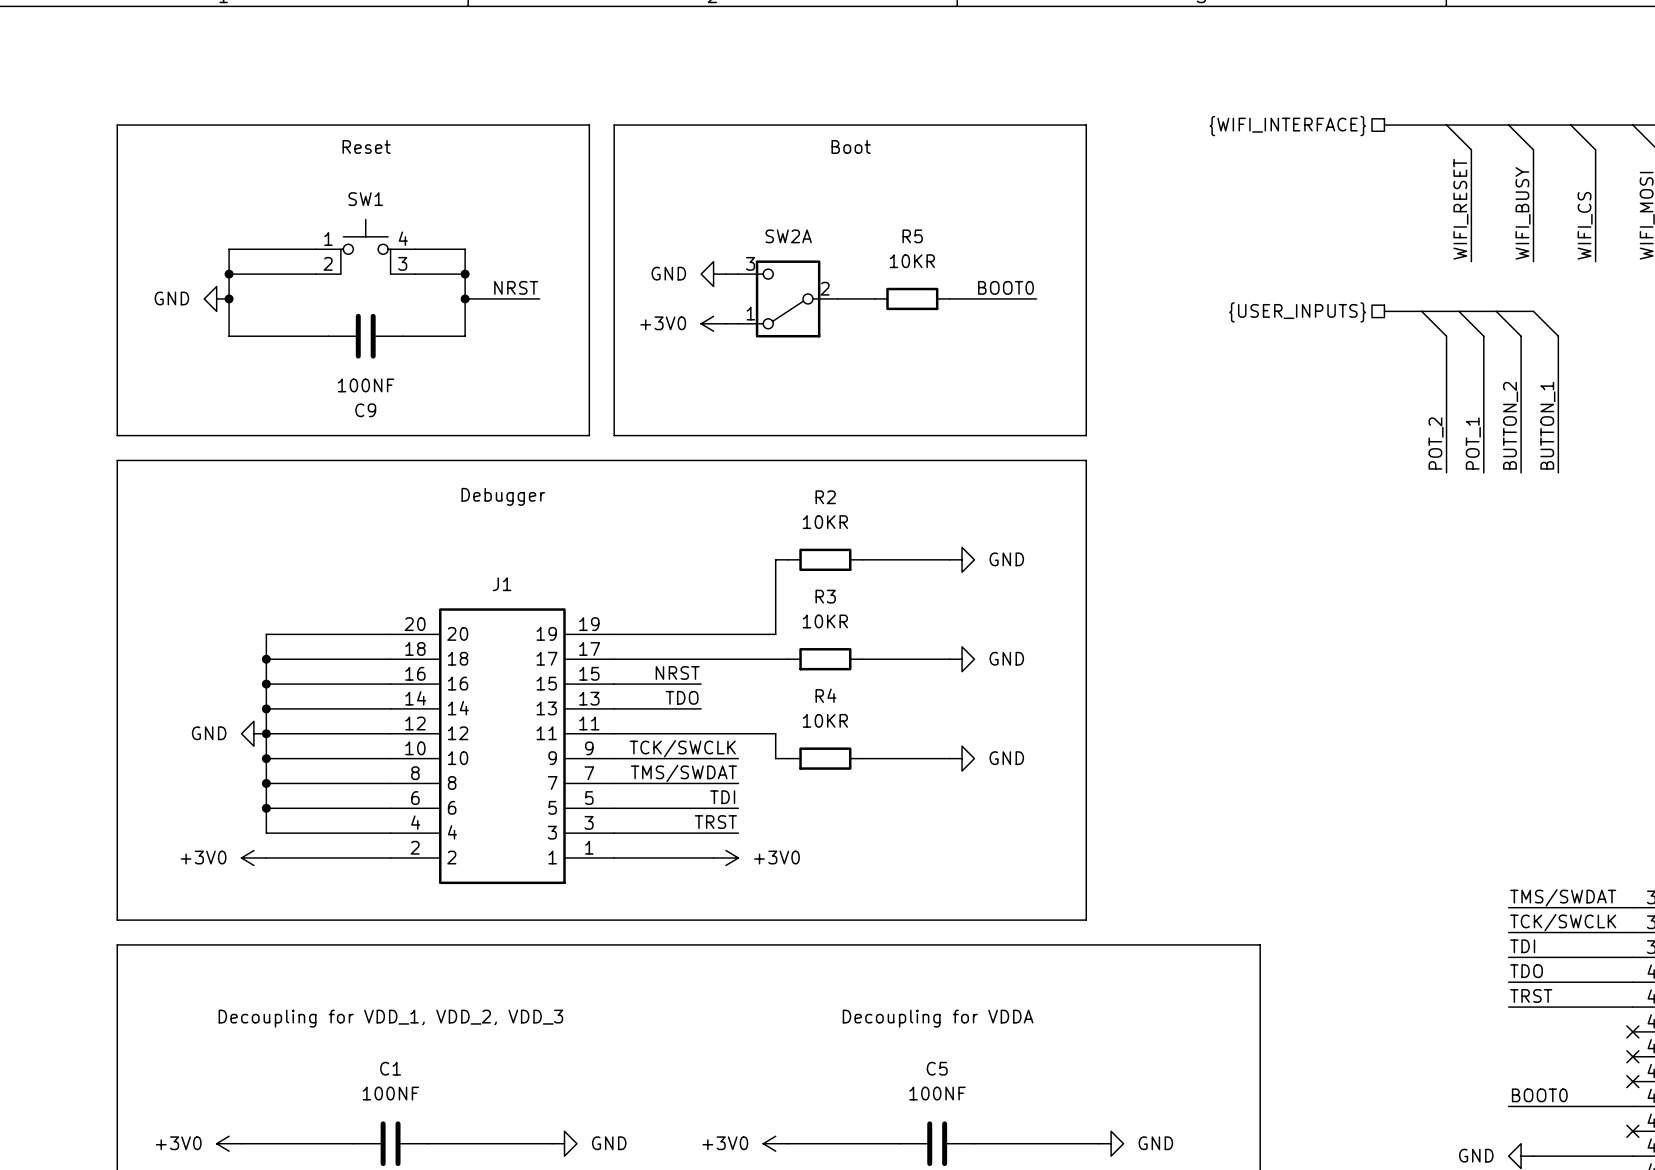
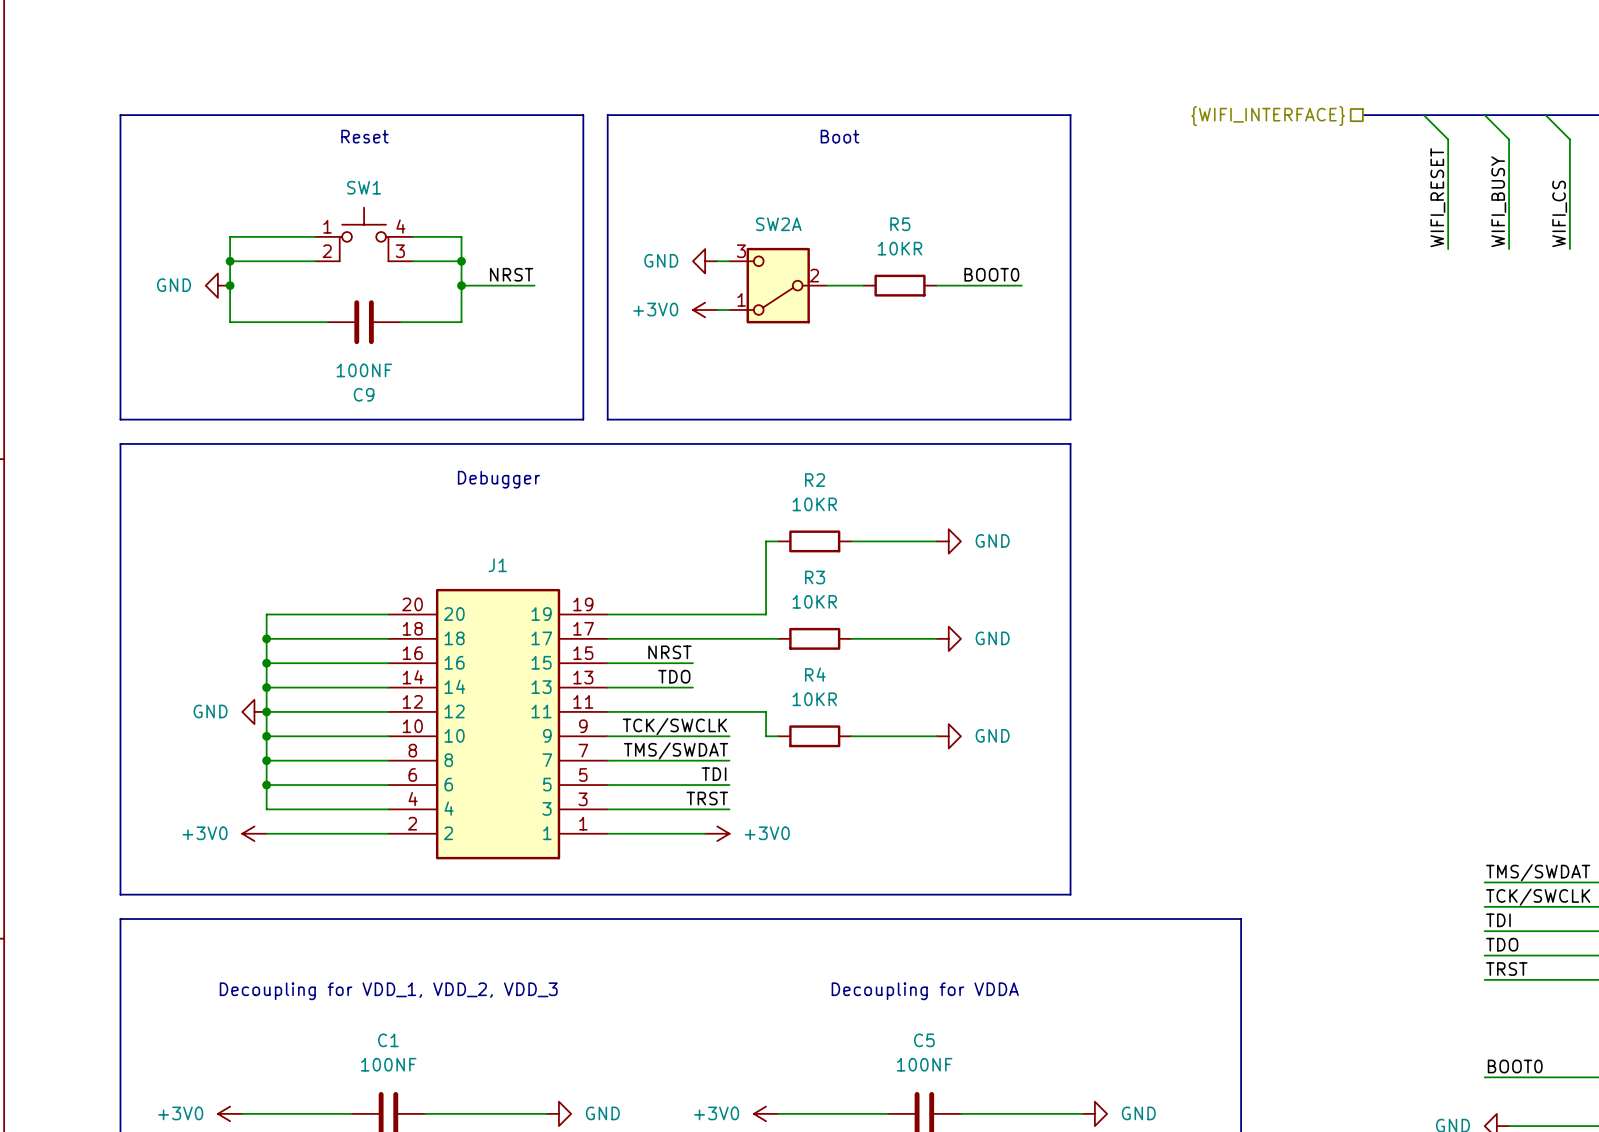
bus: (1384, 311) (1533, 311) -> none
wire: (1421, 311) (1446, 336) (1446, 472) -> none
wire: (1458, 311) (1483, 336) (1483, 472) -> none
wire: (1496, 311) (1521, 336) (1521, 472) -> none
wire: (1533, 311) (1558, 336) (1558, 472) -> none
hierarchical label: {USER_INPUTS} (1297, 312) -> none
label: BUTTON_2 (1510, 425) -> none
label: BUTTON_1 (1547, 425) -> none
label: POT_2 (1436, 443) -> none
label: POT_1 (1473, 443) -> none

